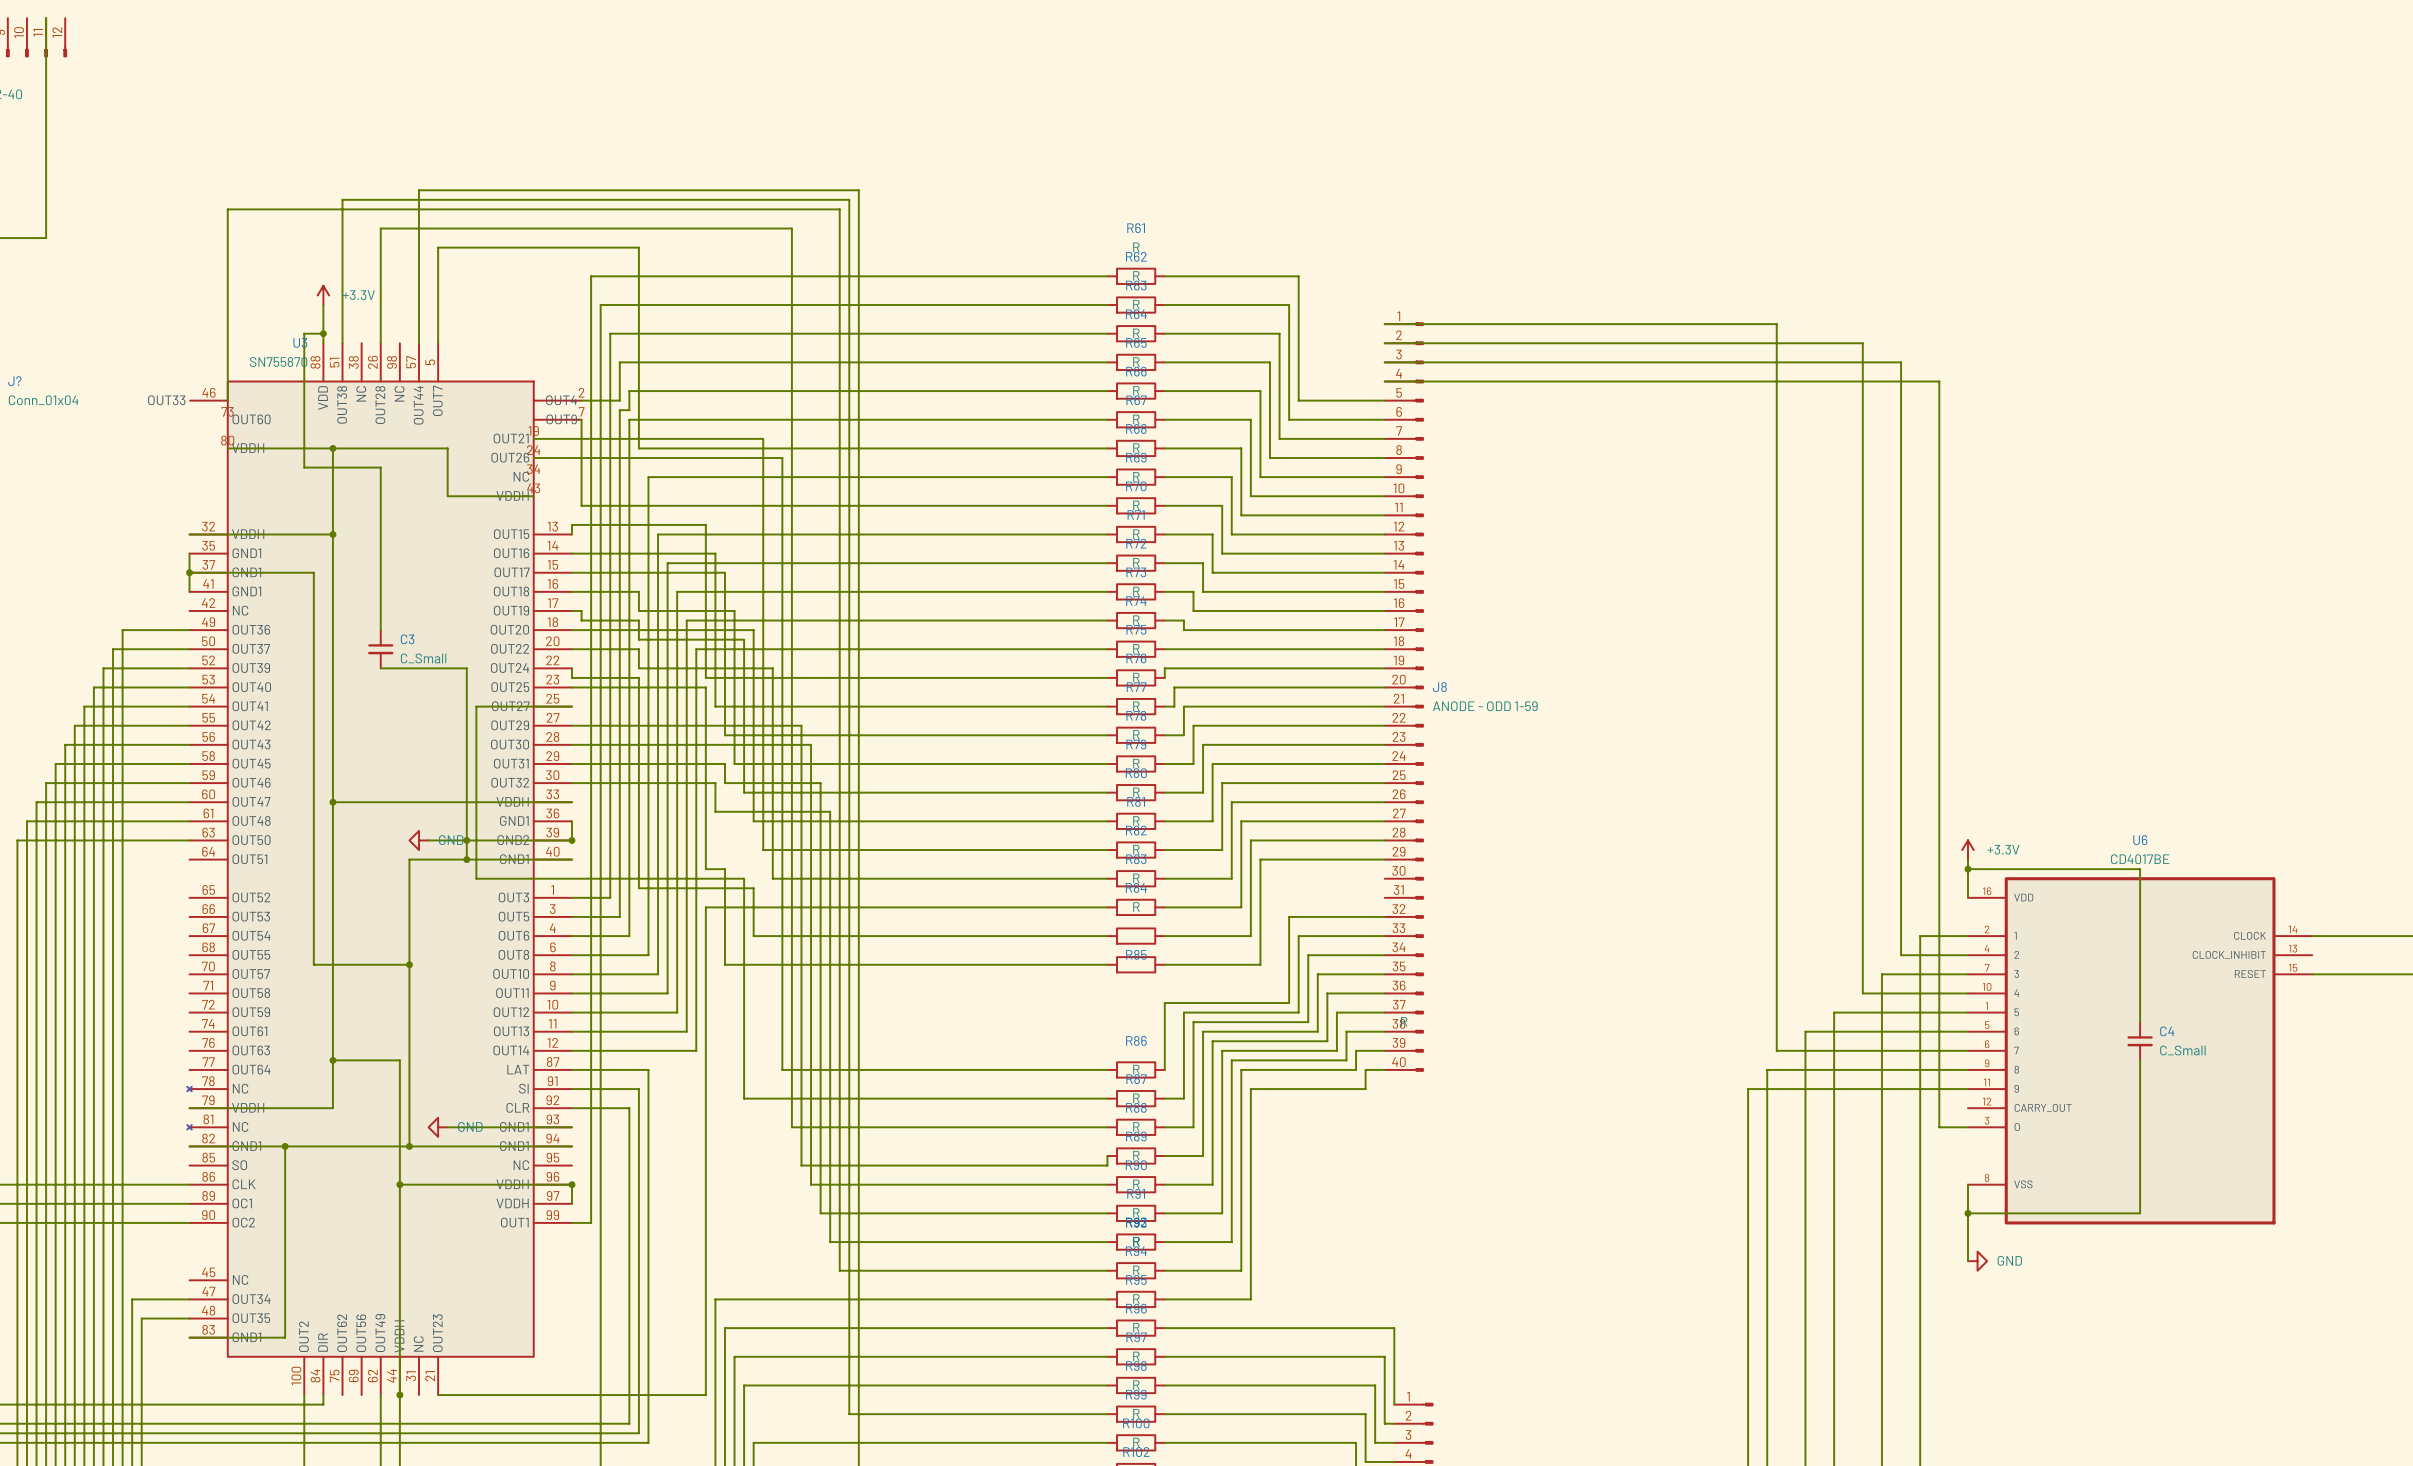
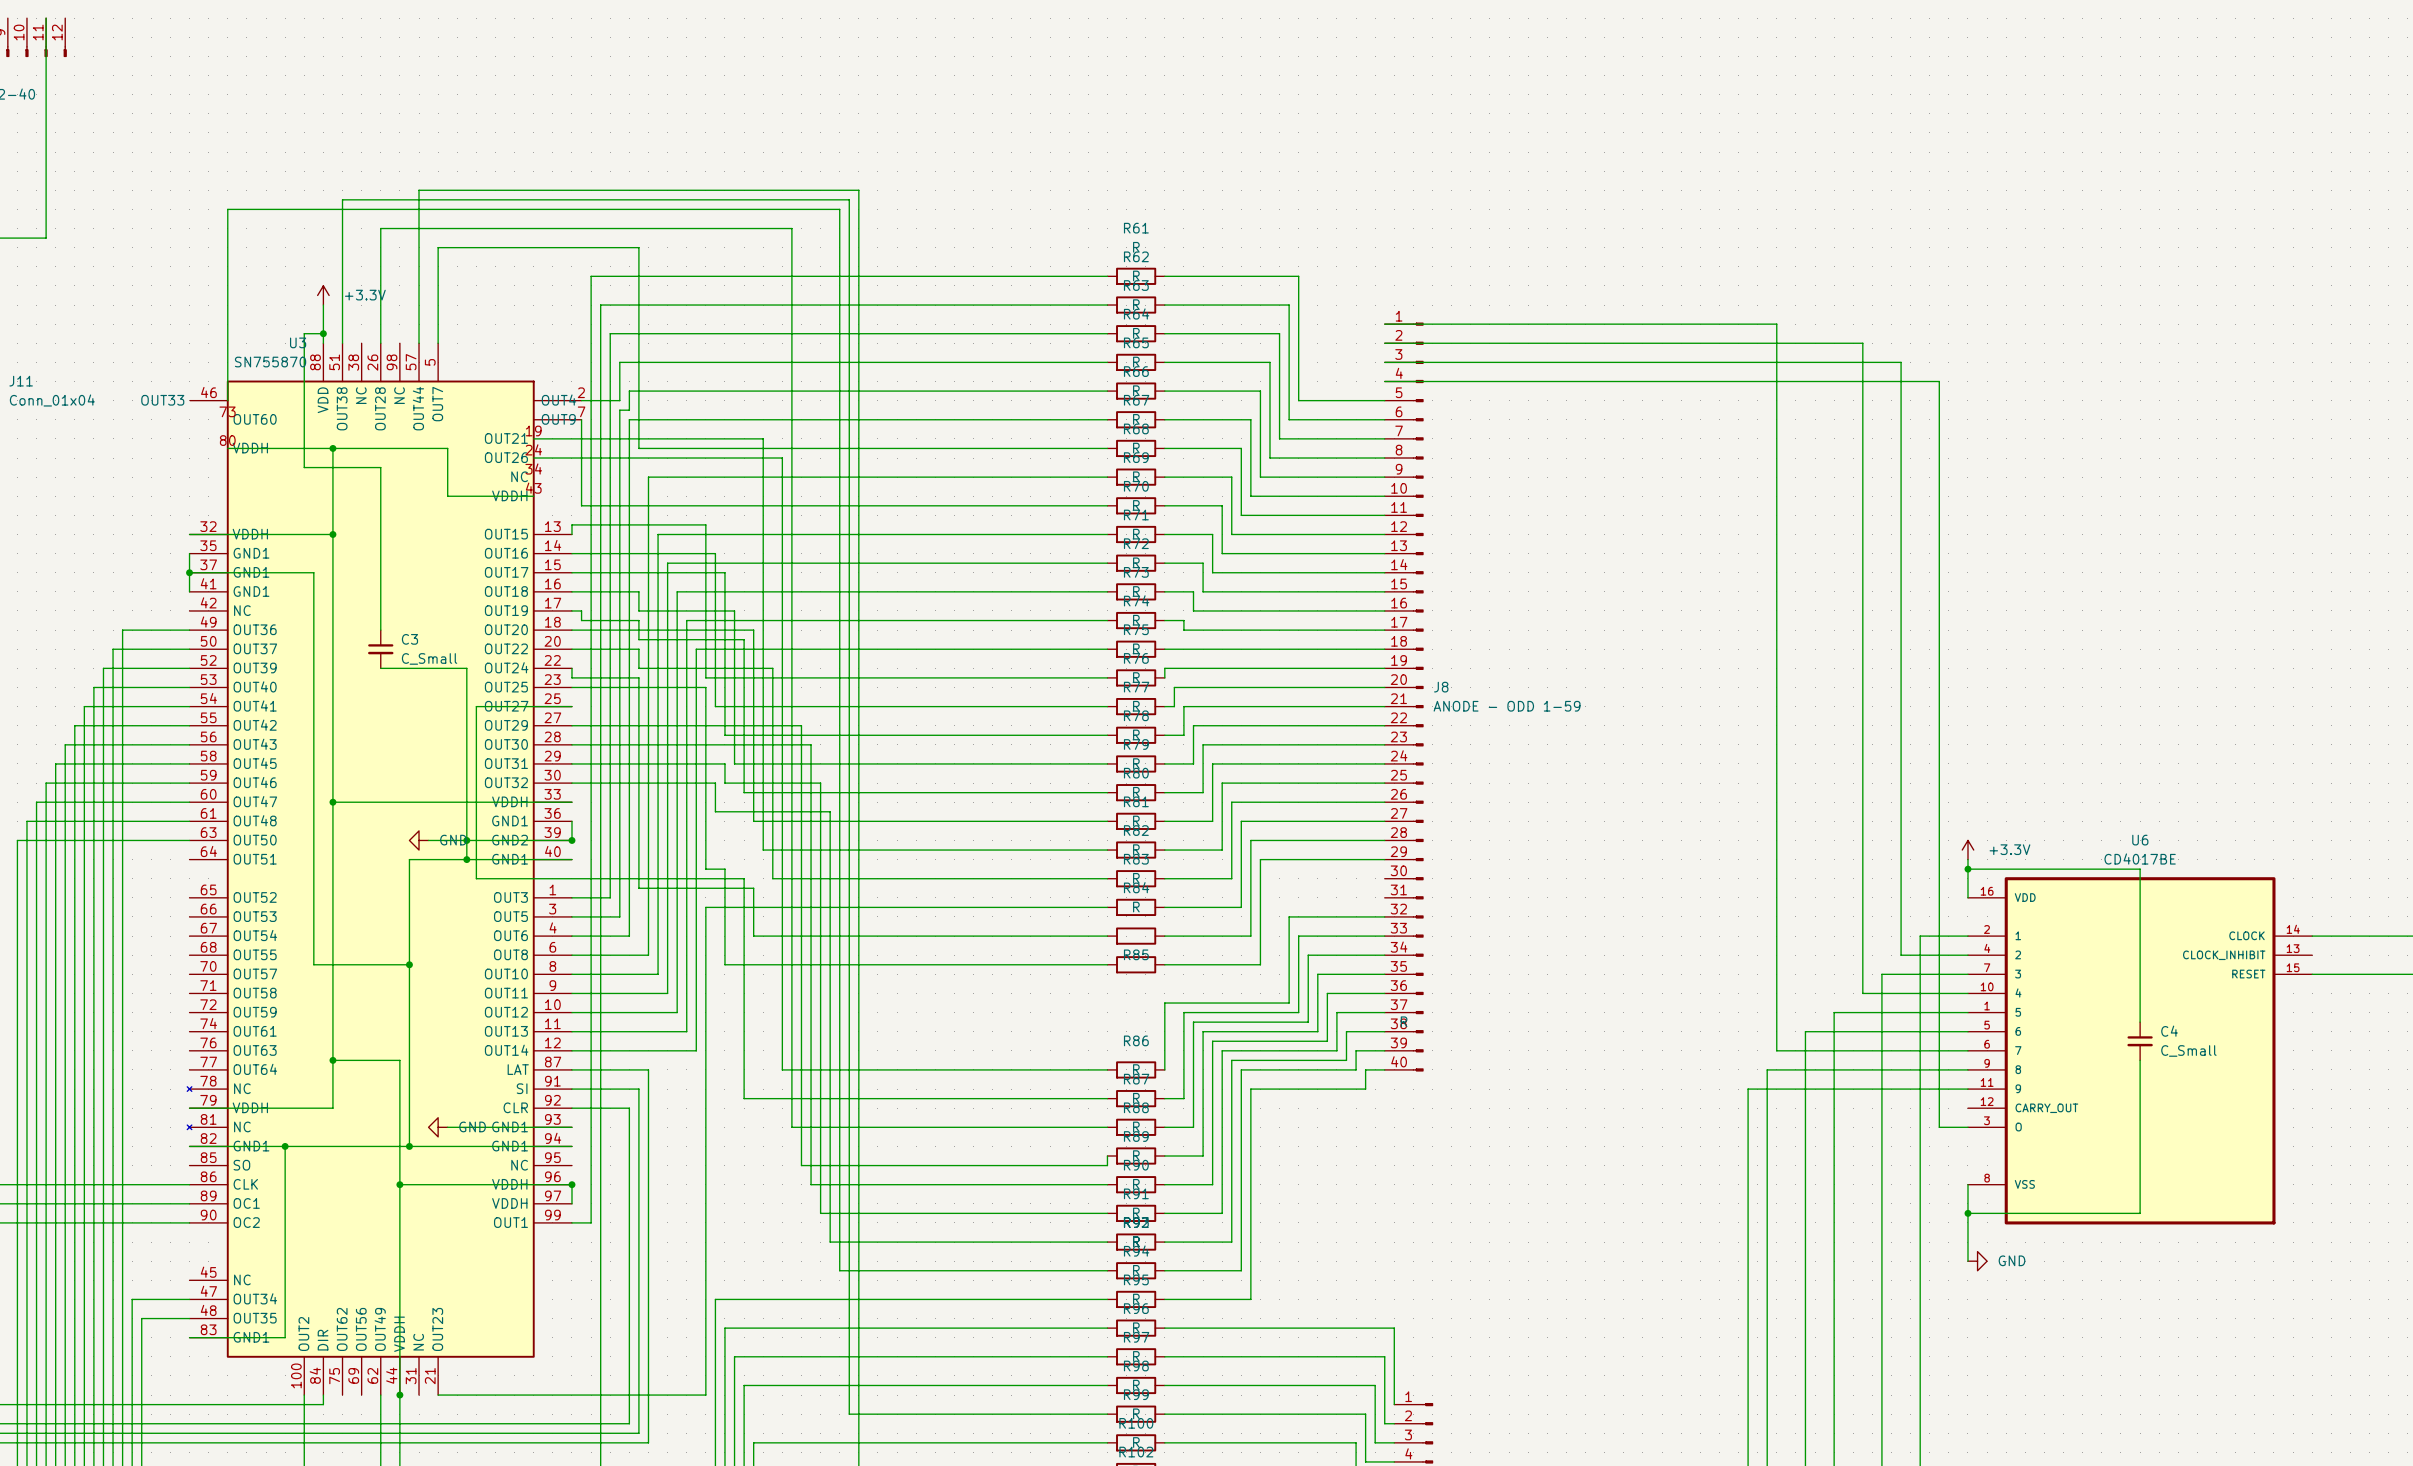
J? name: J? (14, 381) -> J11 (21, 381)

